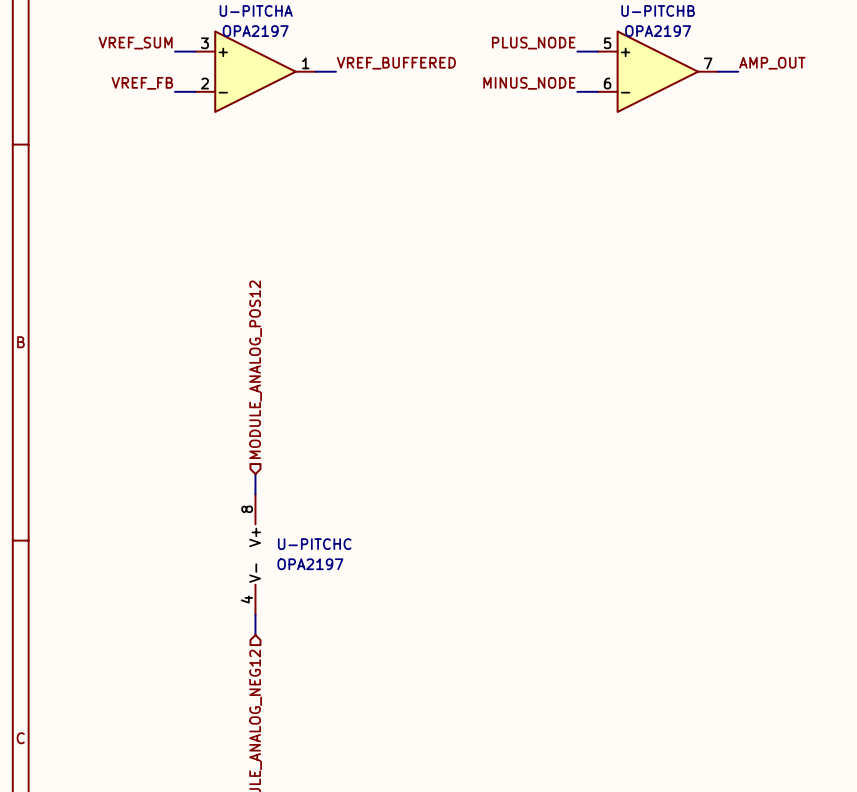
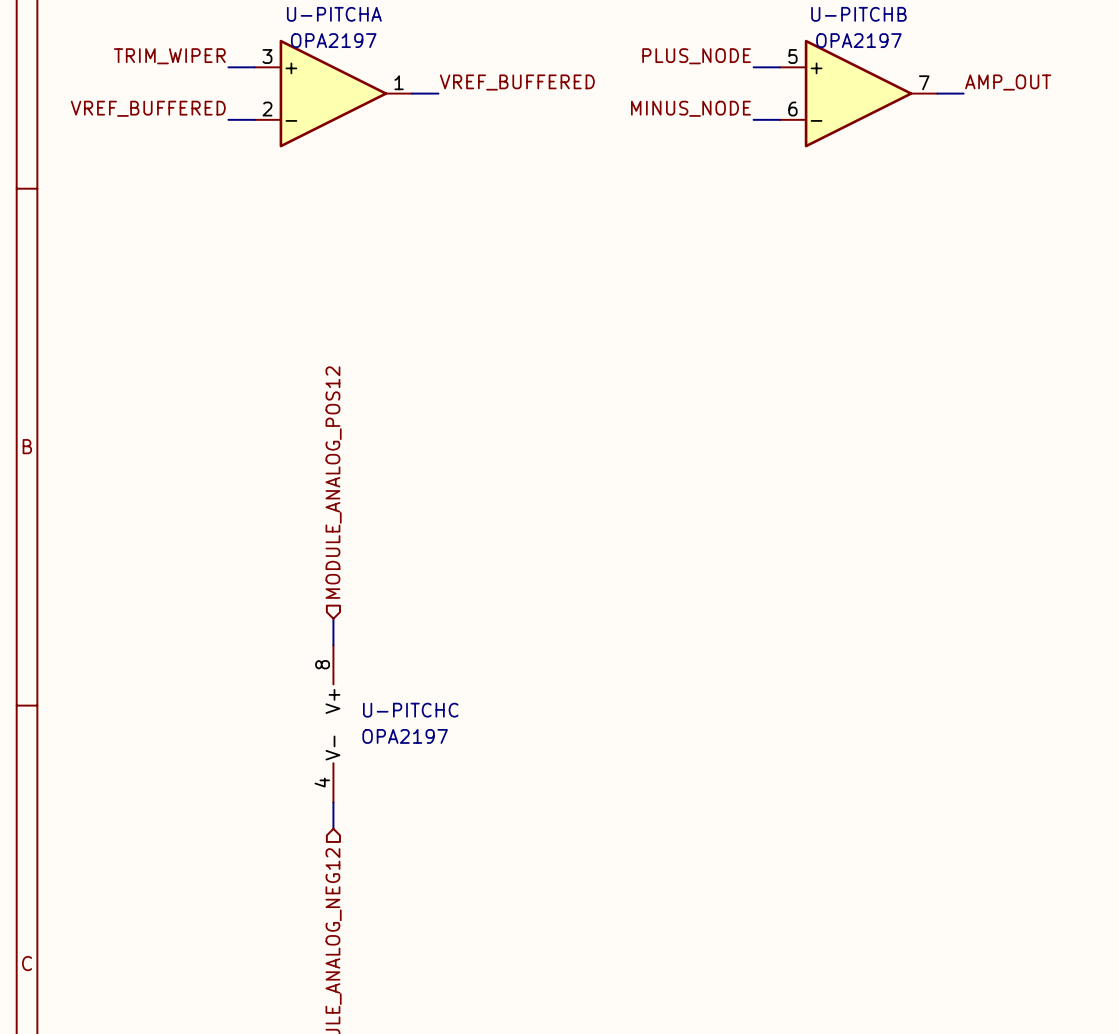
label: VREF_SUM (135, 43) -> TRIM_WIPER (169, 56)
label: VREF_FB (142, 83) -> VREF_BUFFERED (148, 108)

